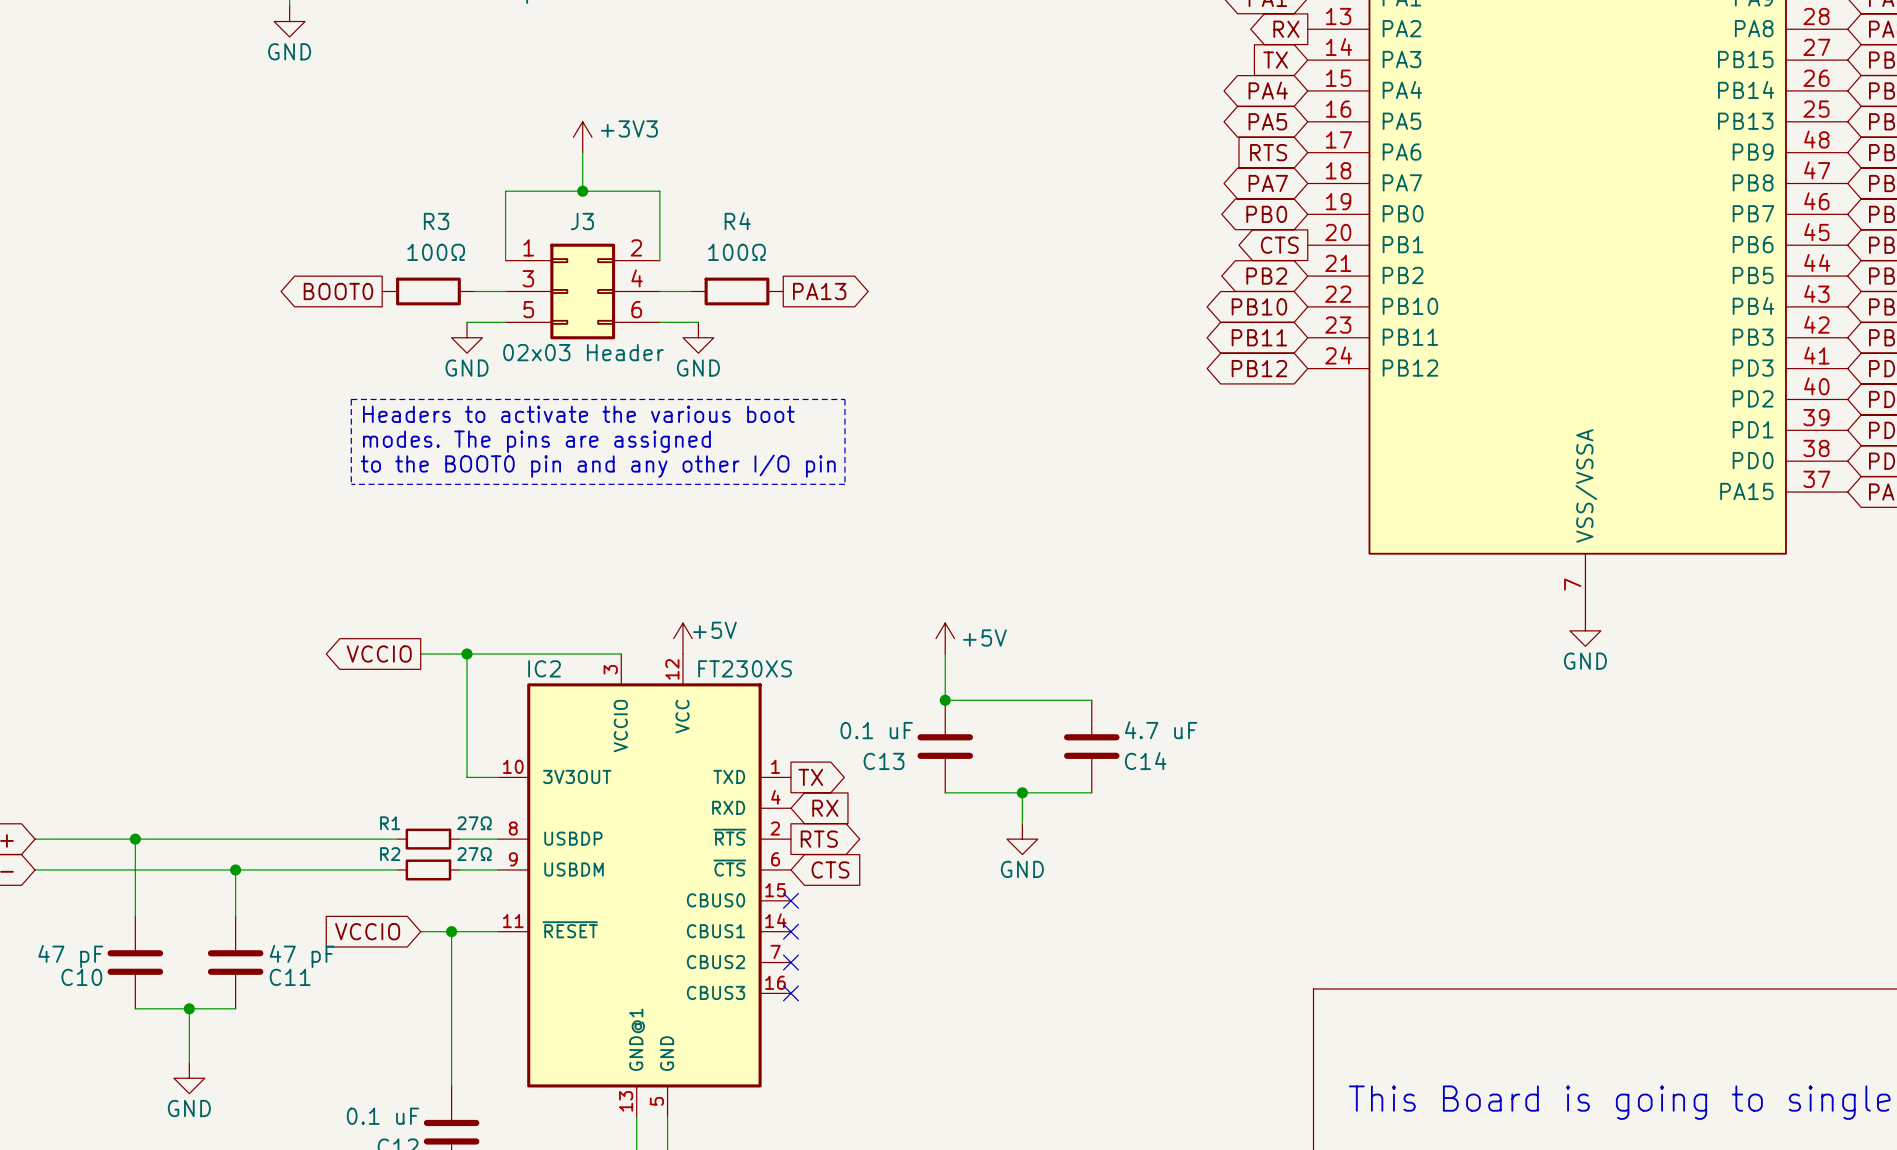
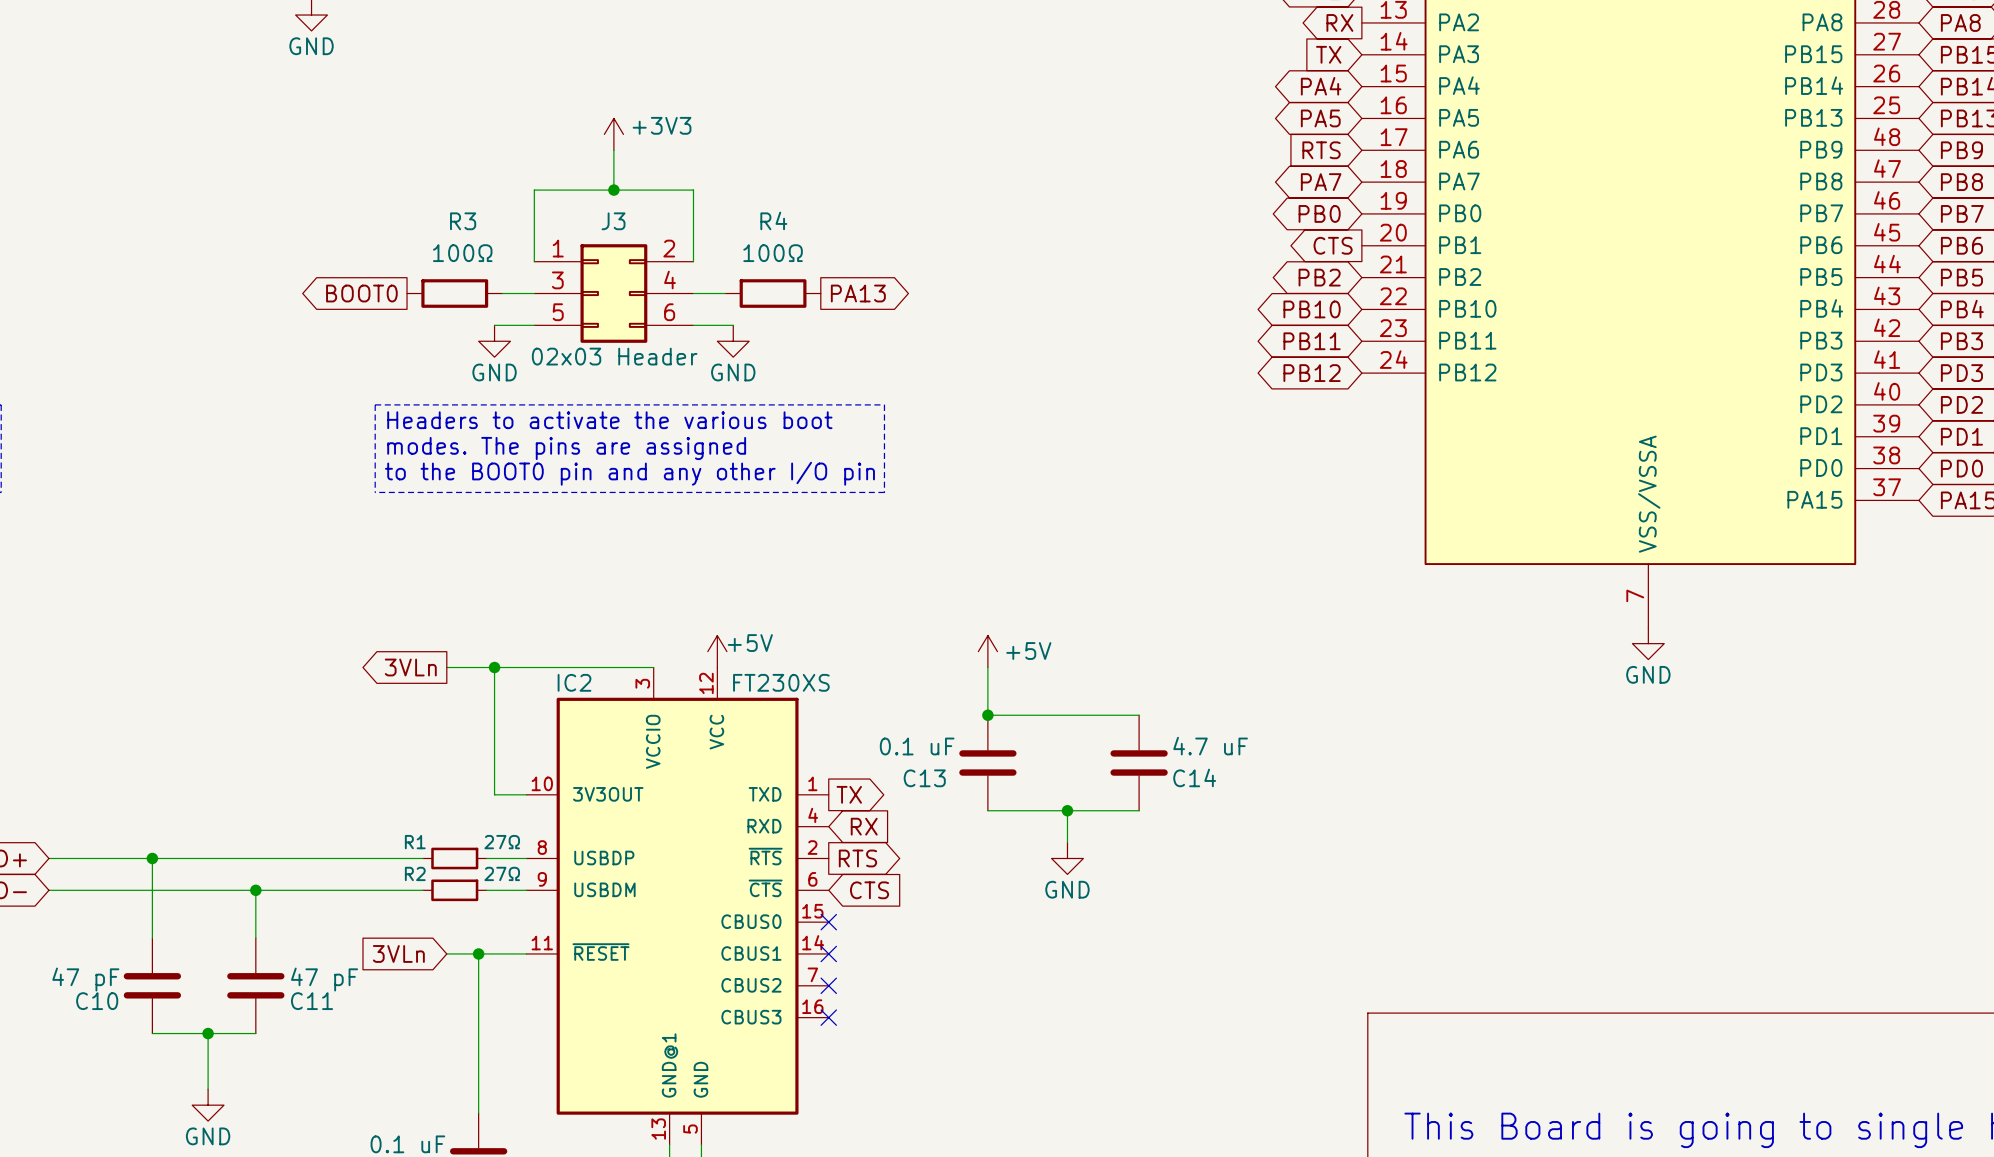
global label: VCCIO (379, 654) -> 3VLn (410, 667)
global label: VCCIO (367, 931) -> 3VLn (398, 953)

